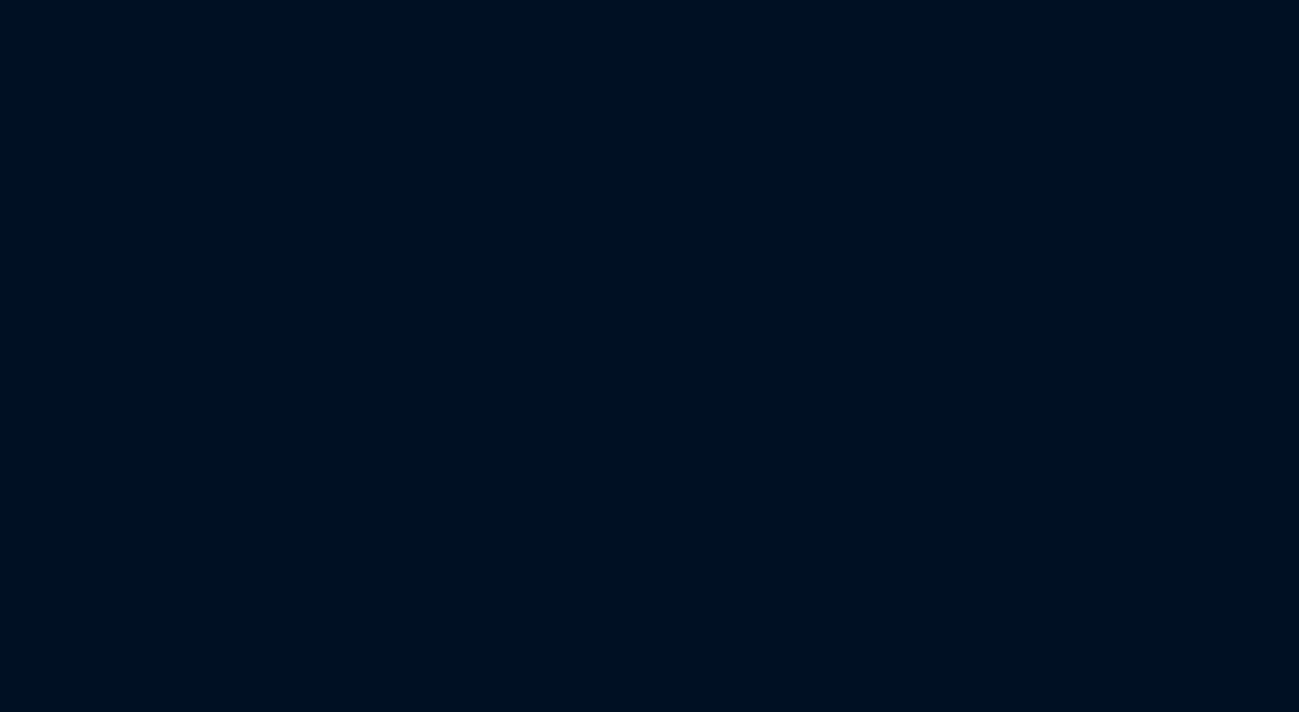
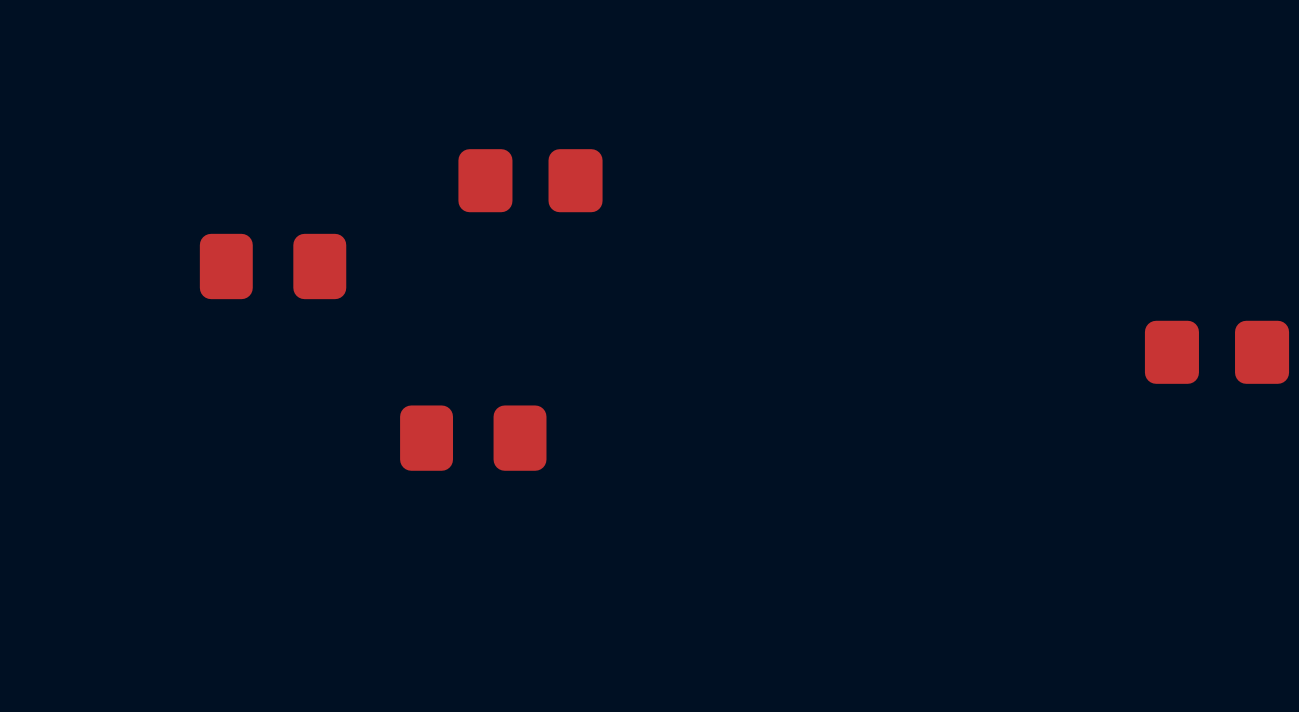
part: none -> (530, 180)
part: none -> (273, 266)
part: none -> (1217, 352)
part: none -> (473, 438)

